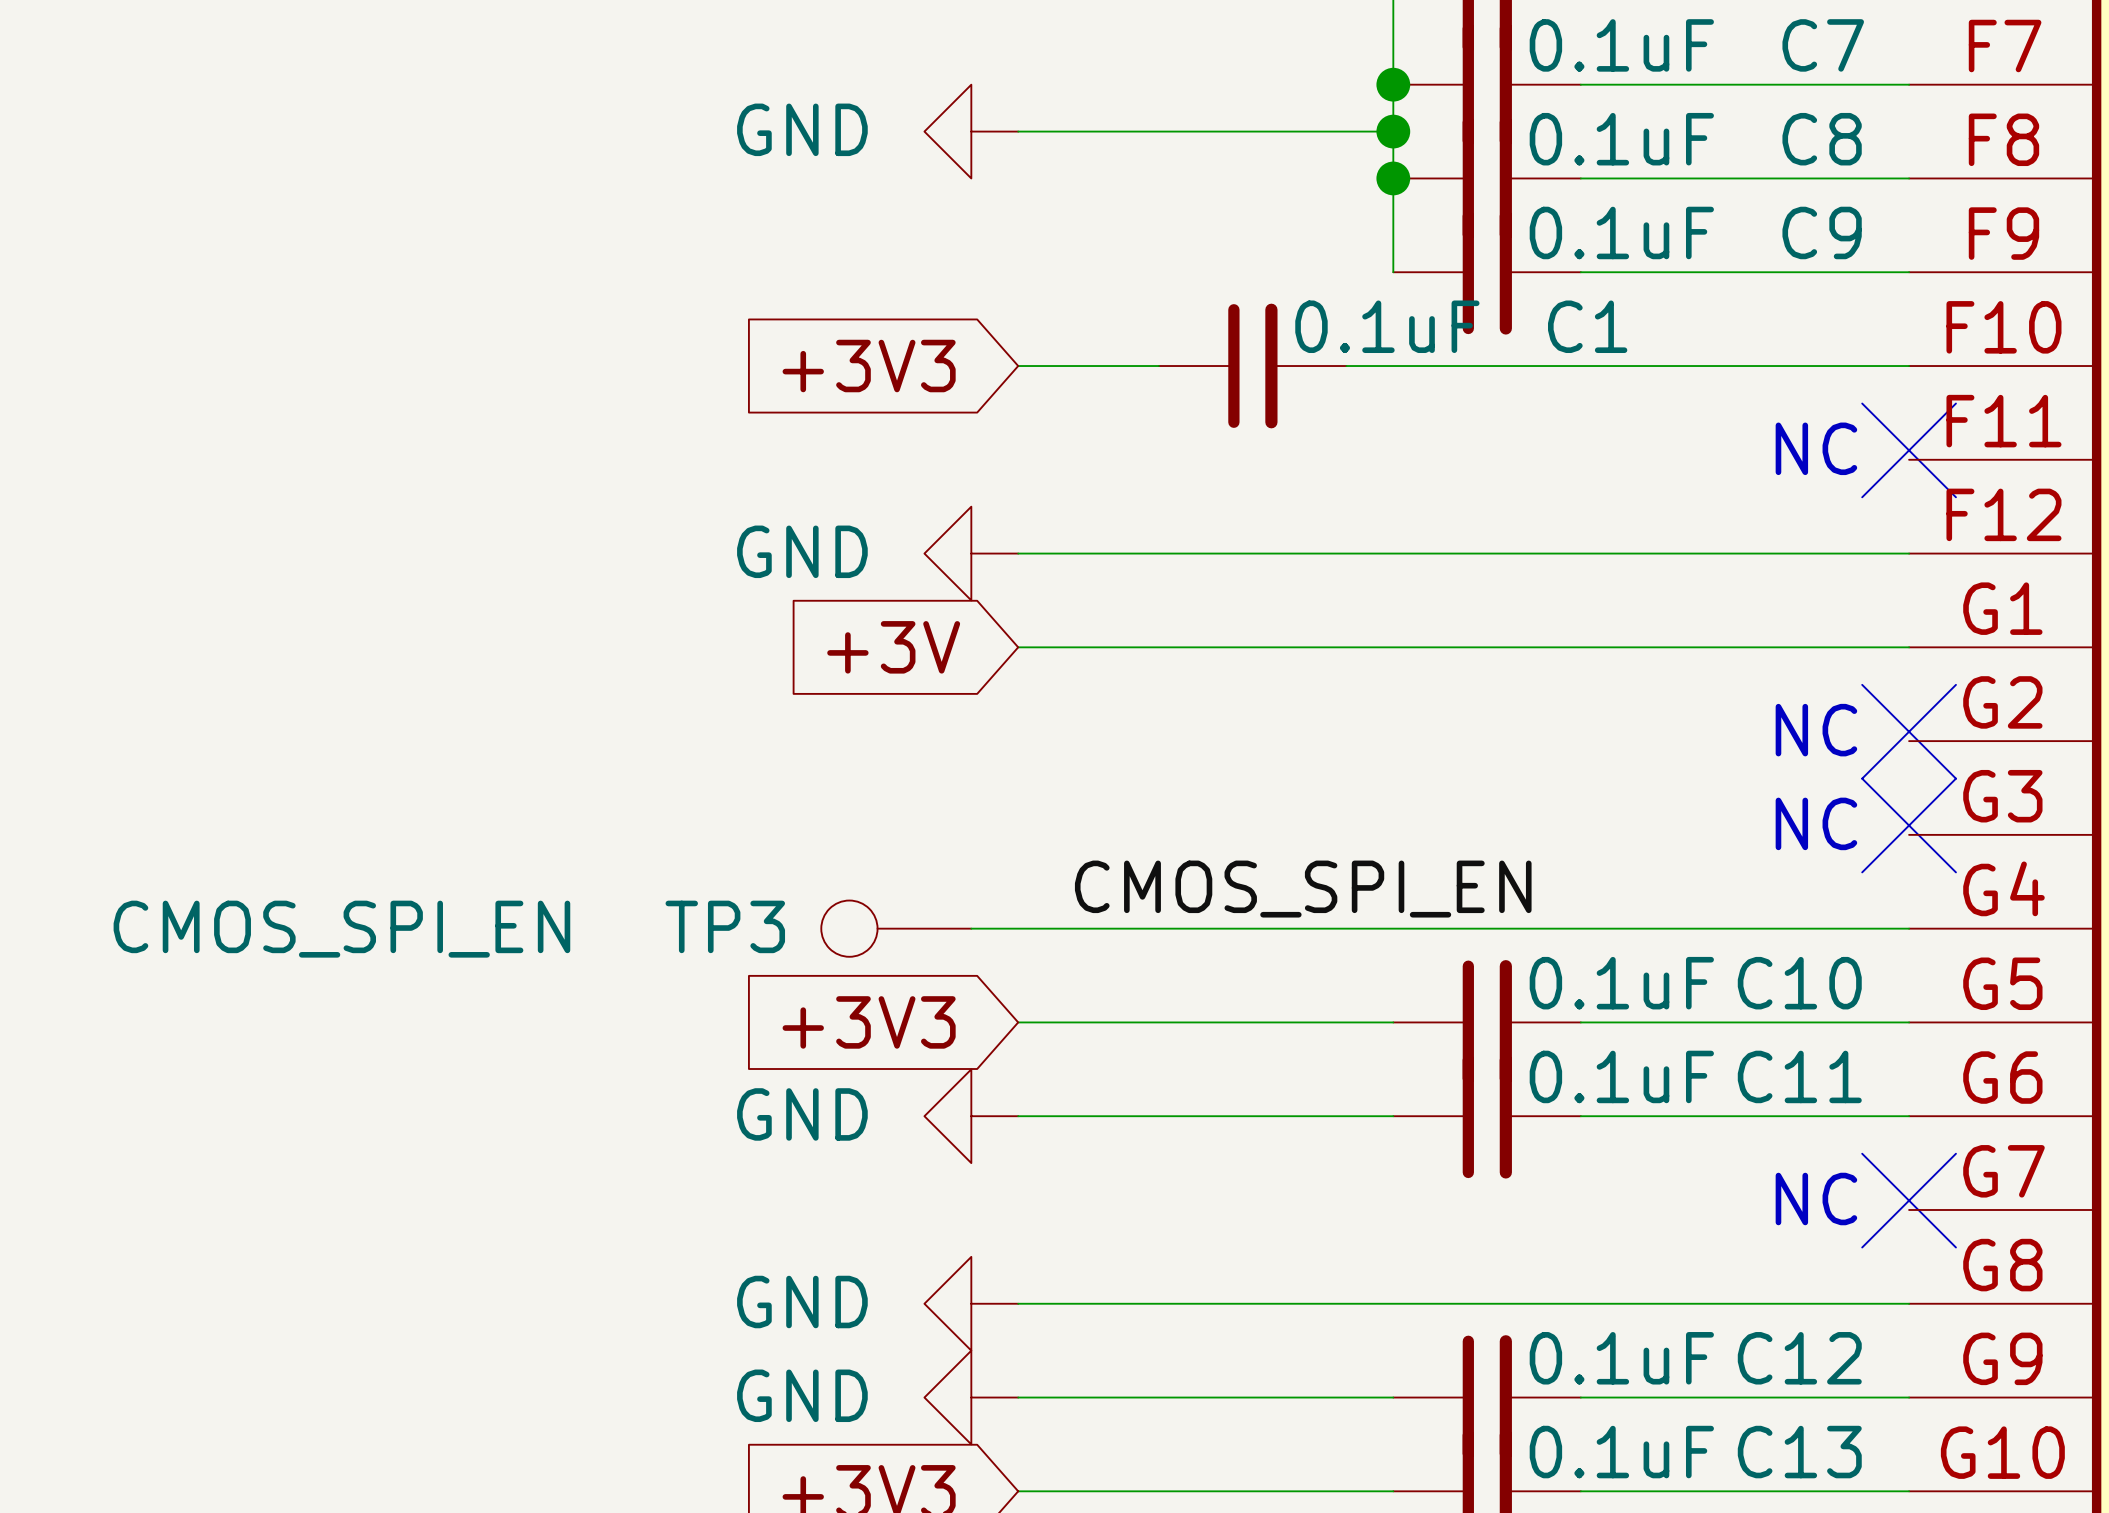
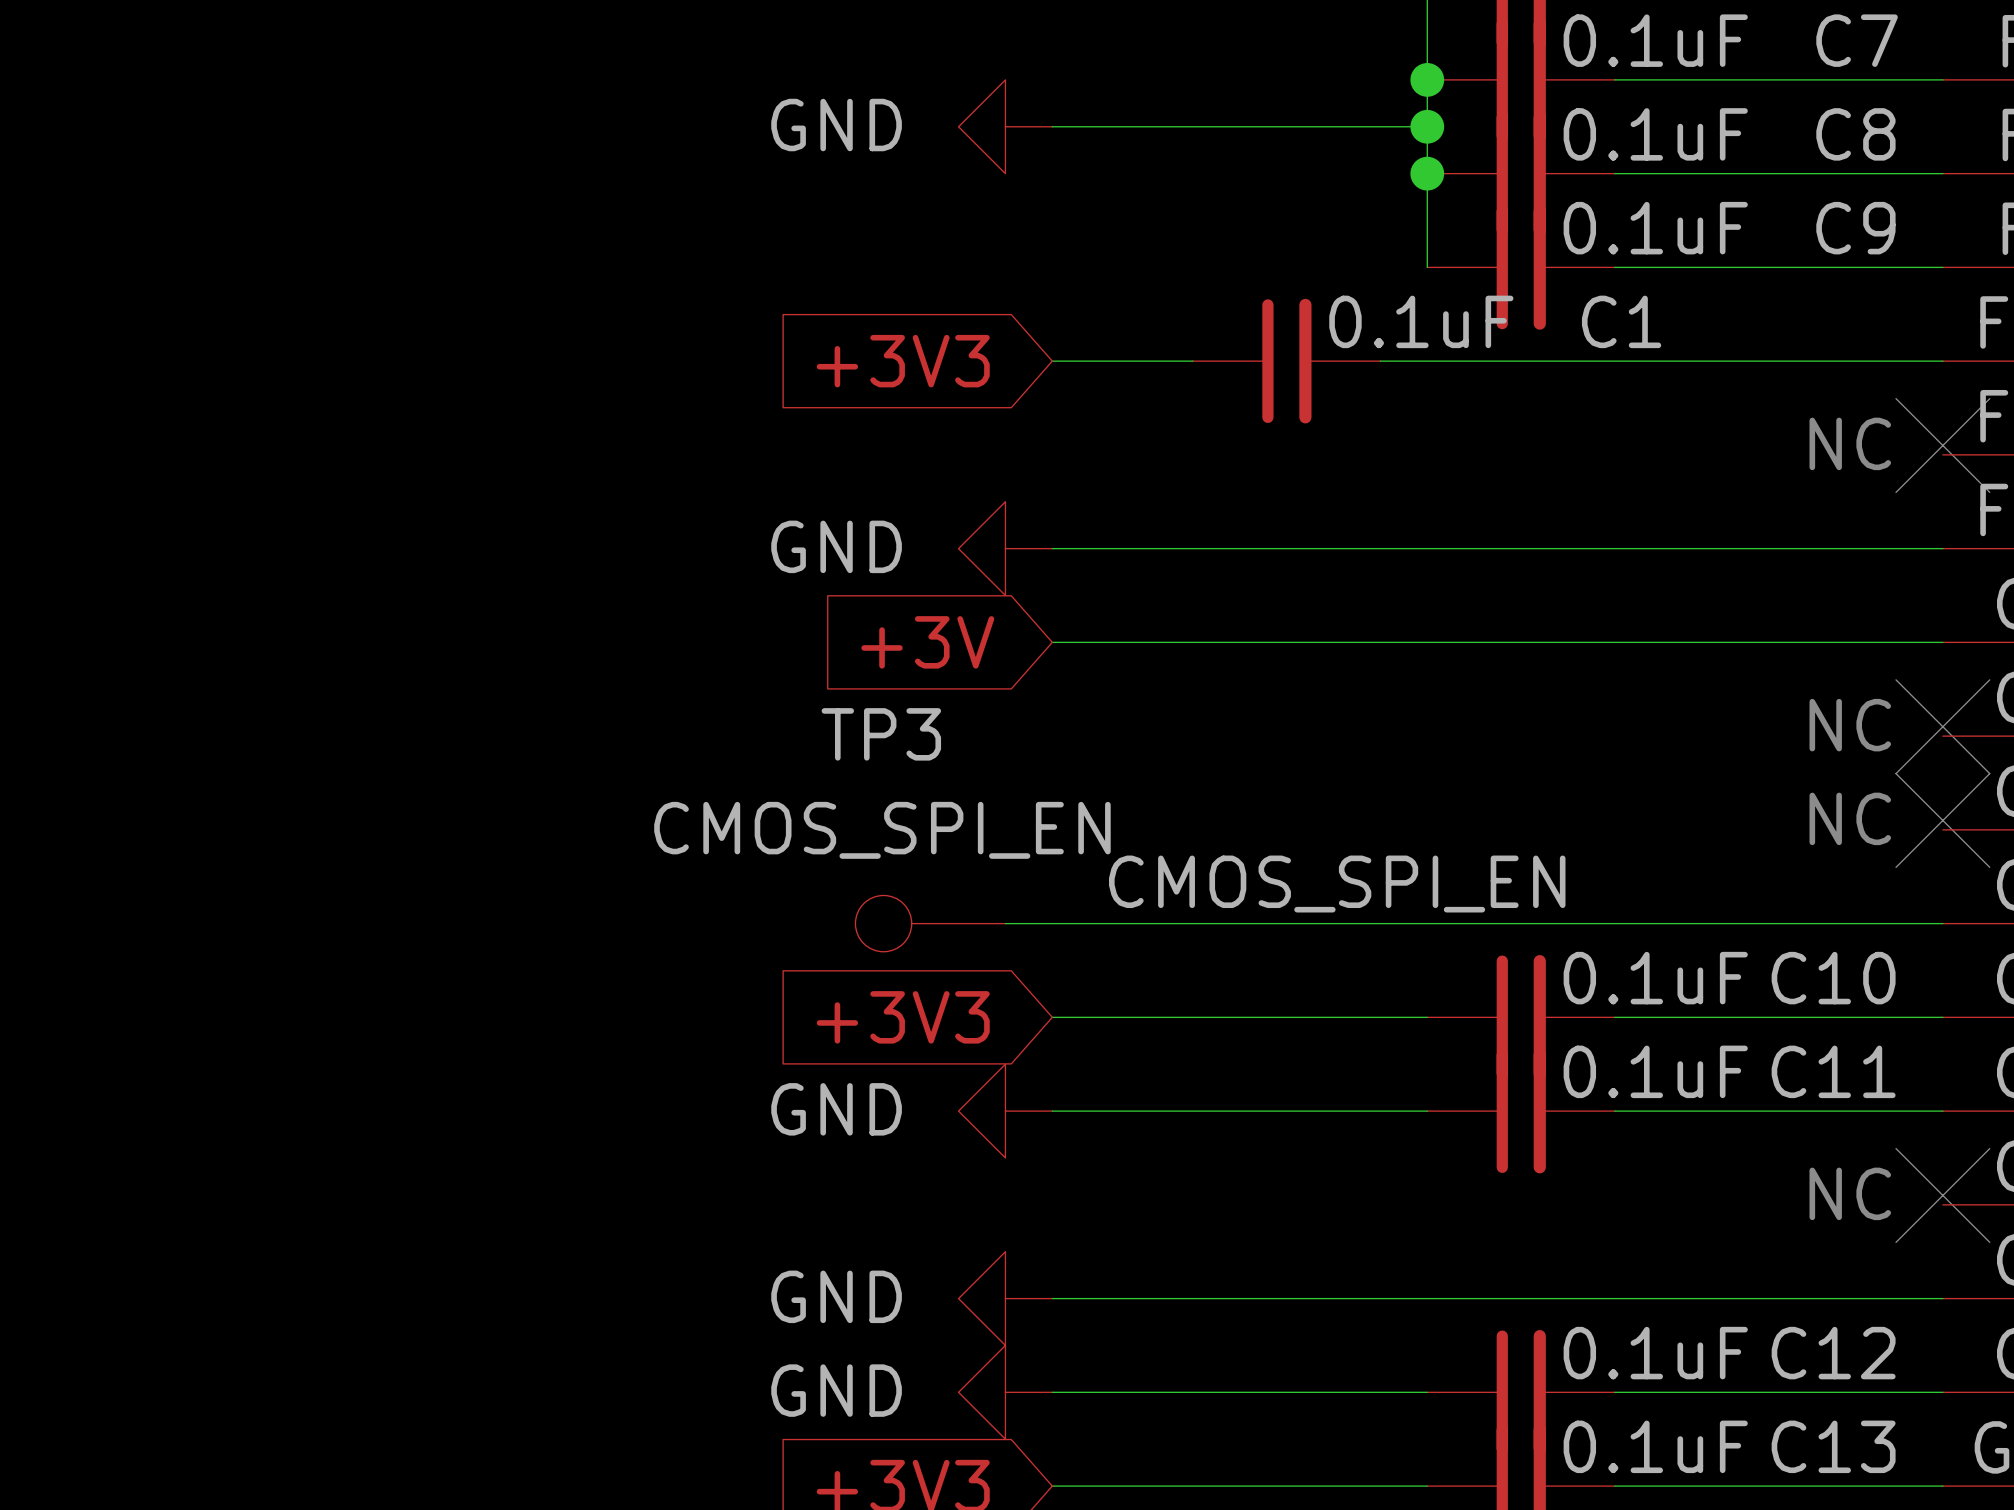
TP3 name position: TP3 (725, 926) -> TP3 (881, 734)
TP3 value position: CMOS_SPI_EN (341, 929) -> CMOS_SPI_EN (882, 830)

